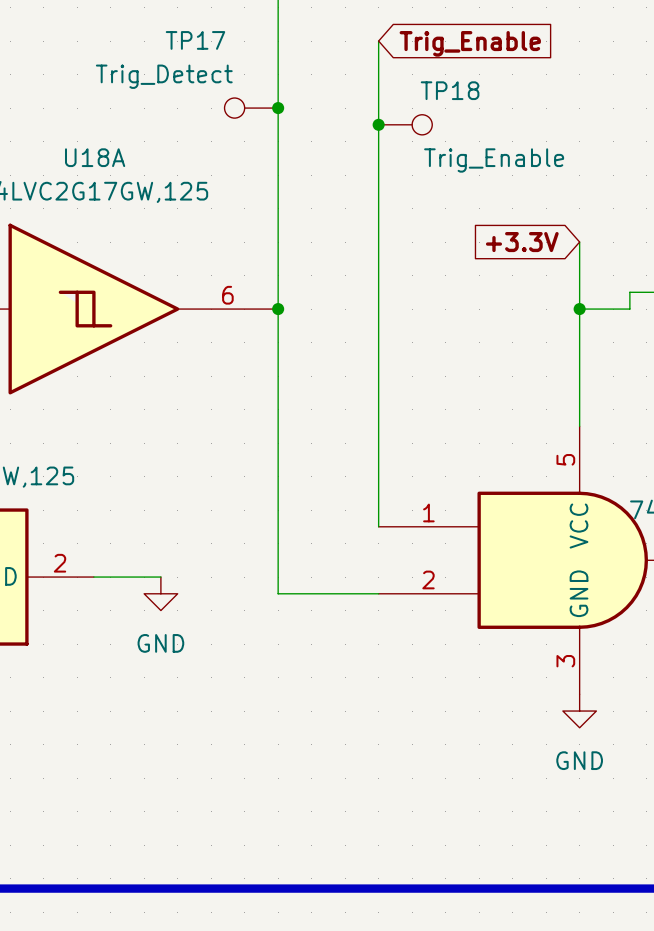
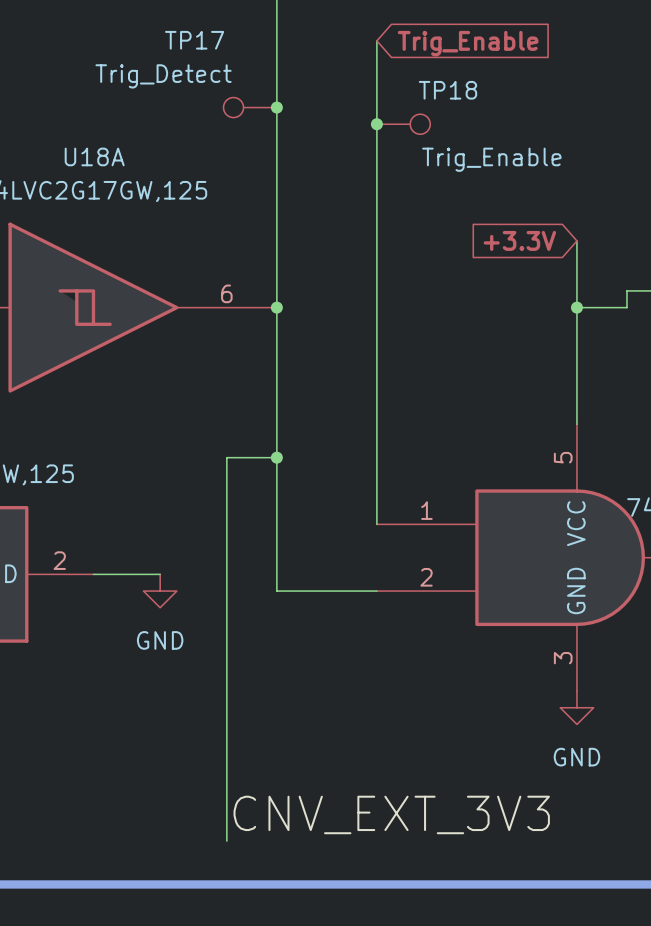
wire: none -> (276, 457) (226, 457) (226, 841)
junction: none -> (276, 457)
label: none -> CNV_EXT_3V3 (391, 814)

